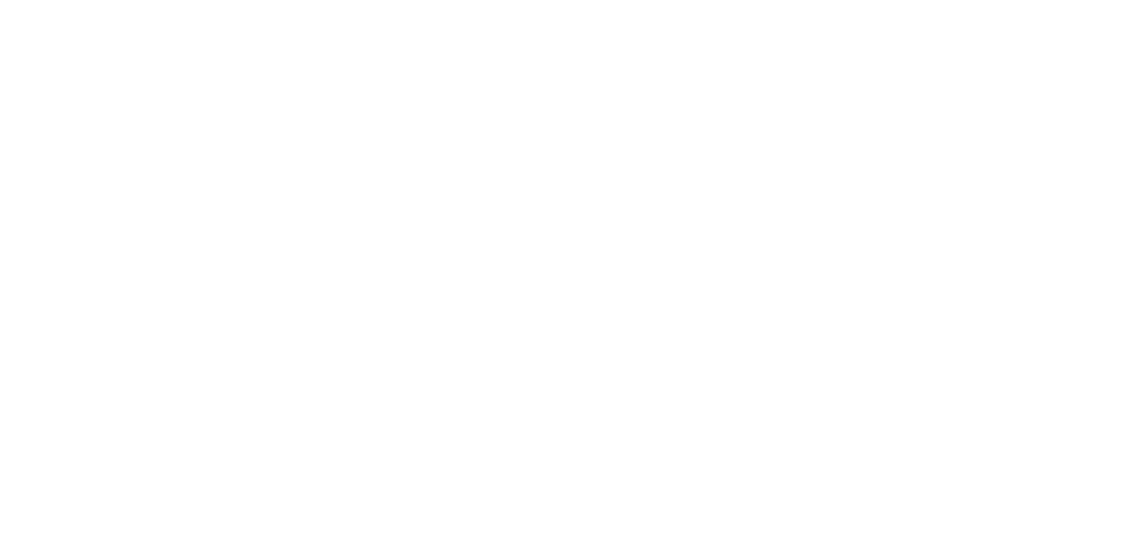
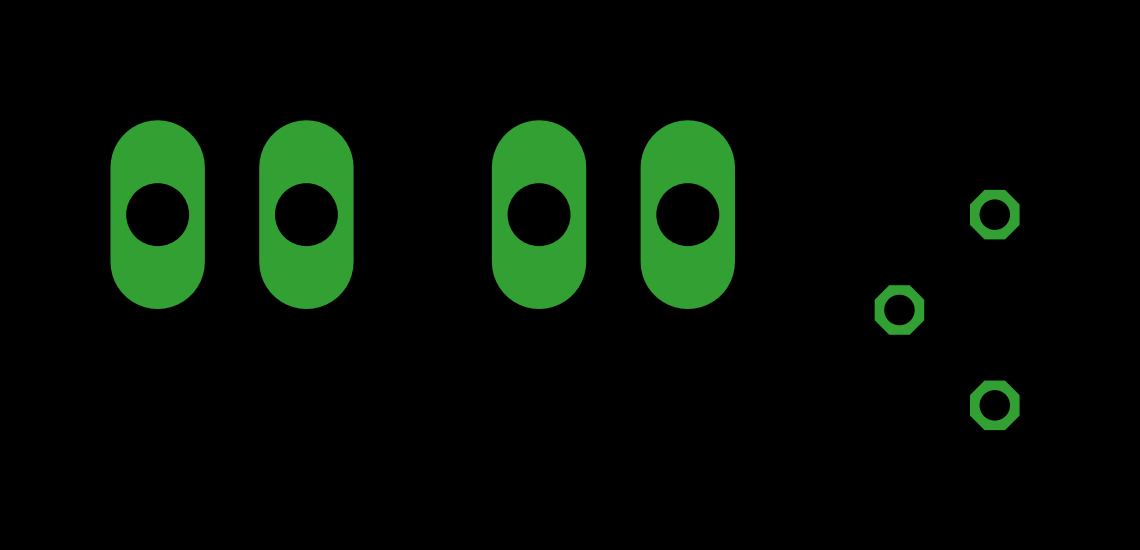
part: none -> (232, 214)
part: none -> (613, 214)
part: none -> (947, 309)

